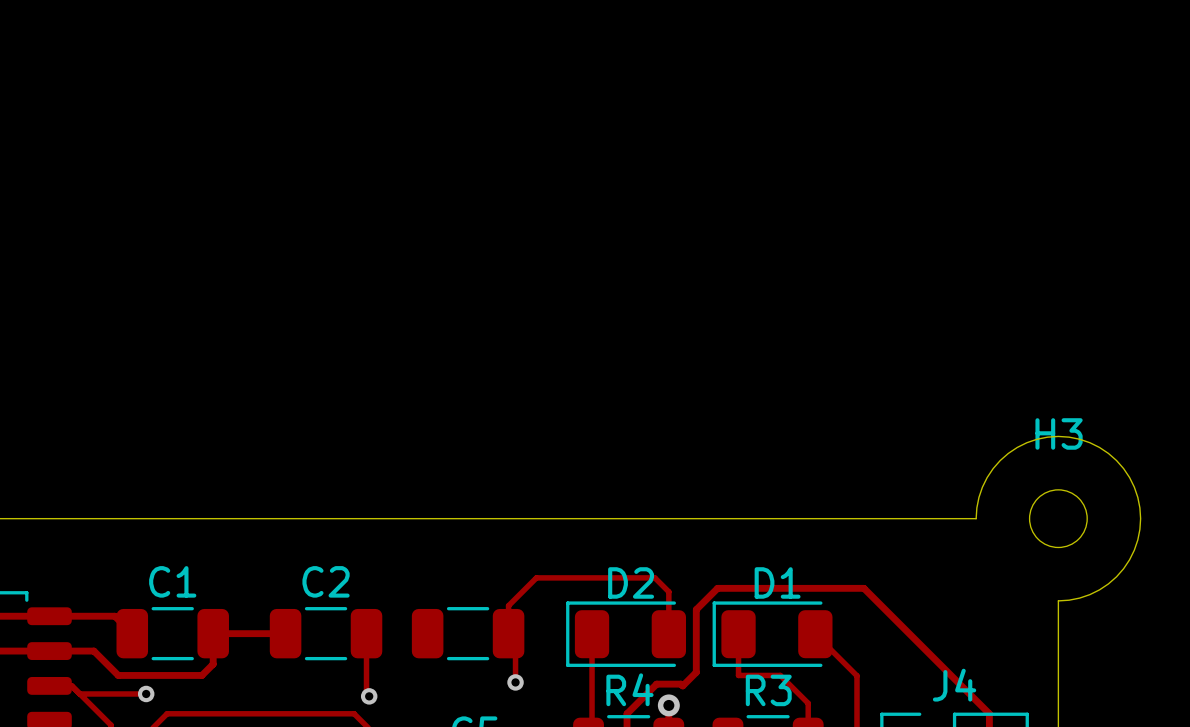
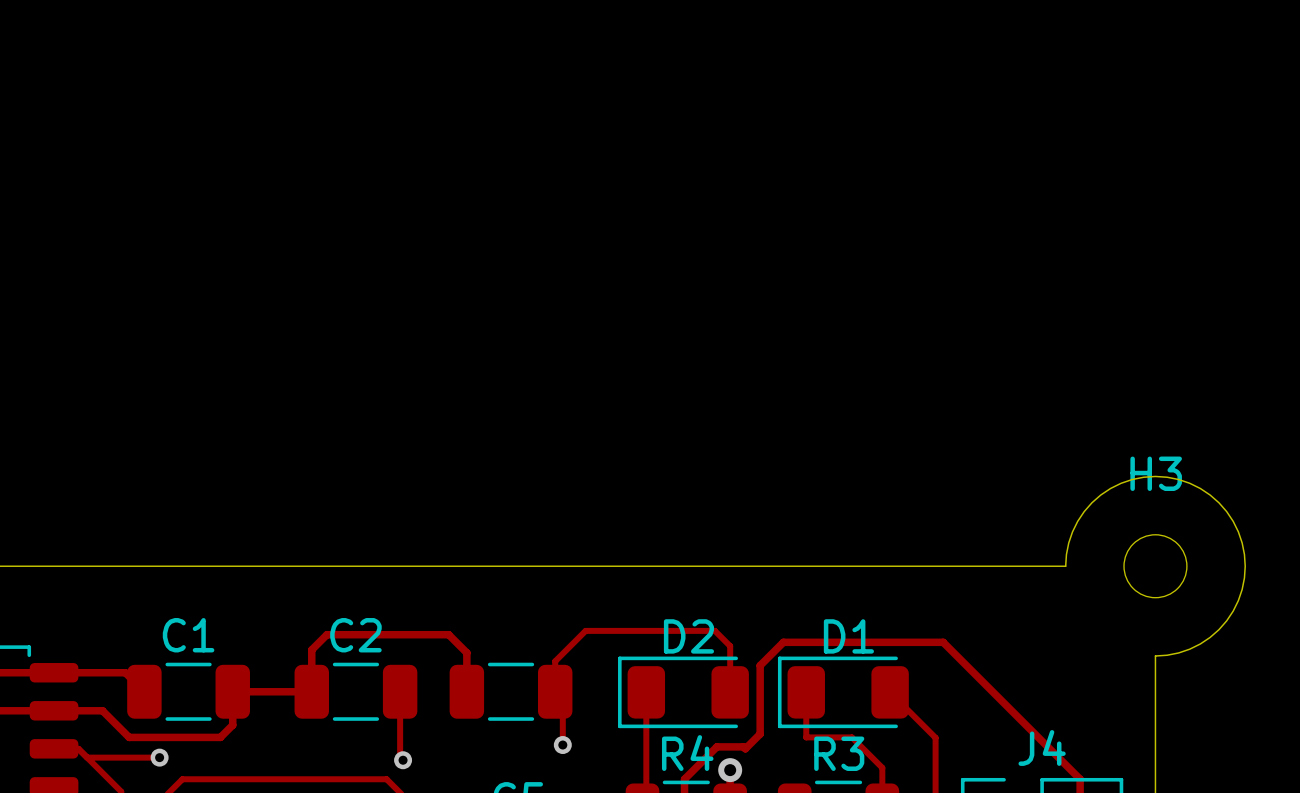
track: none -> (311, 691) (311, 649) (326, 634) (448, 634) (466, 652) (466, 691)

